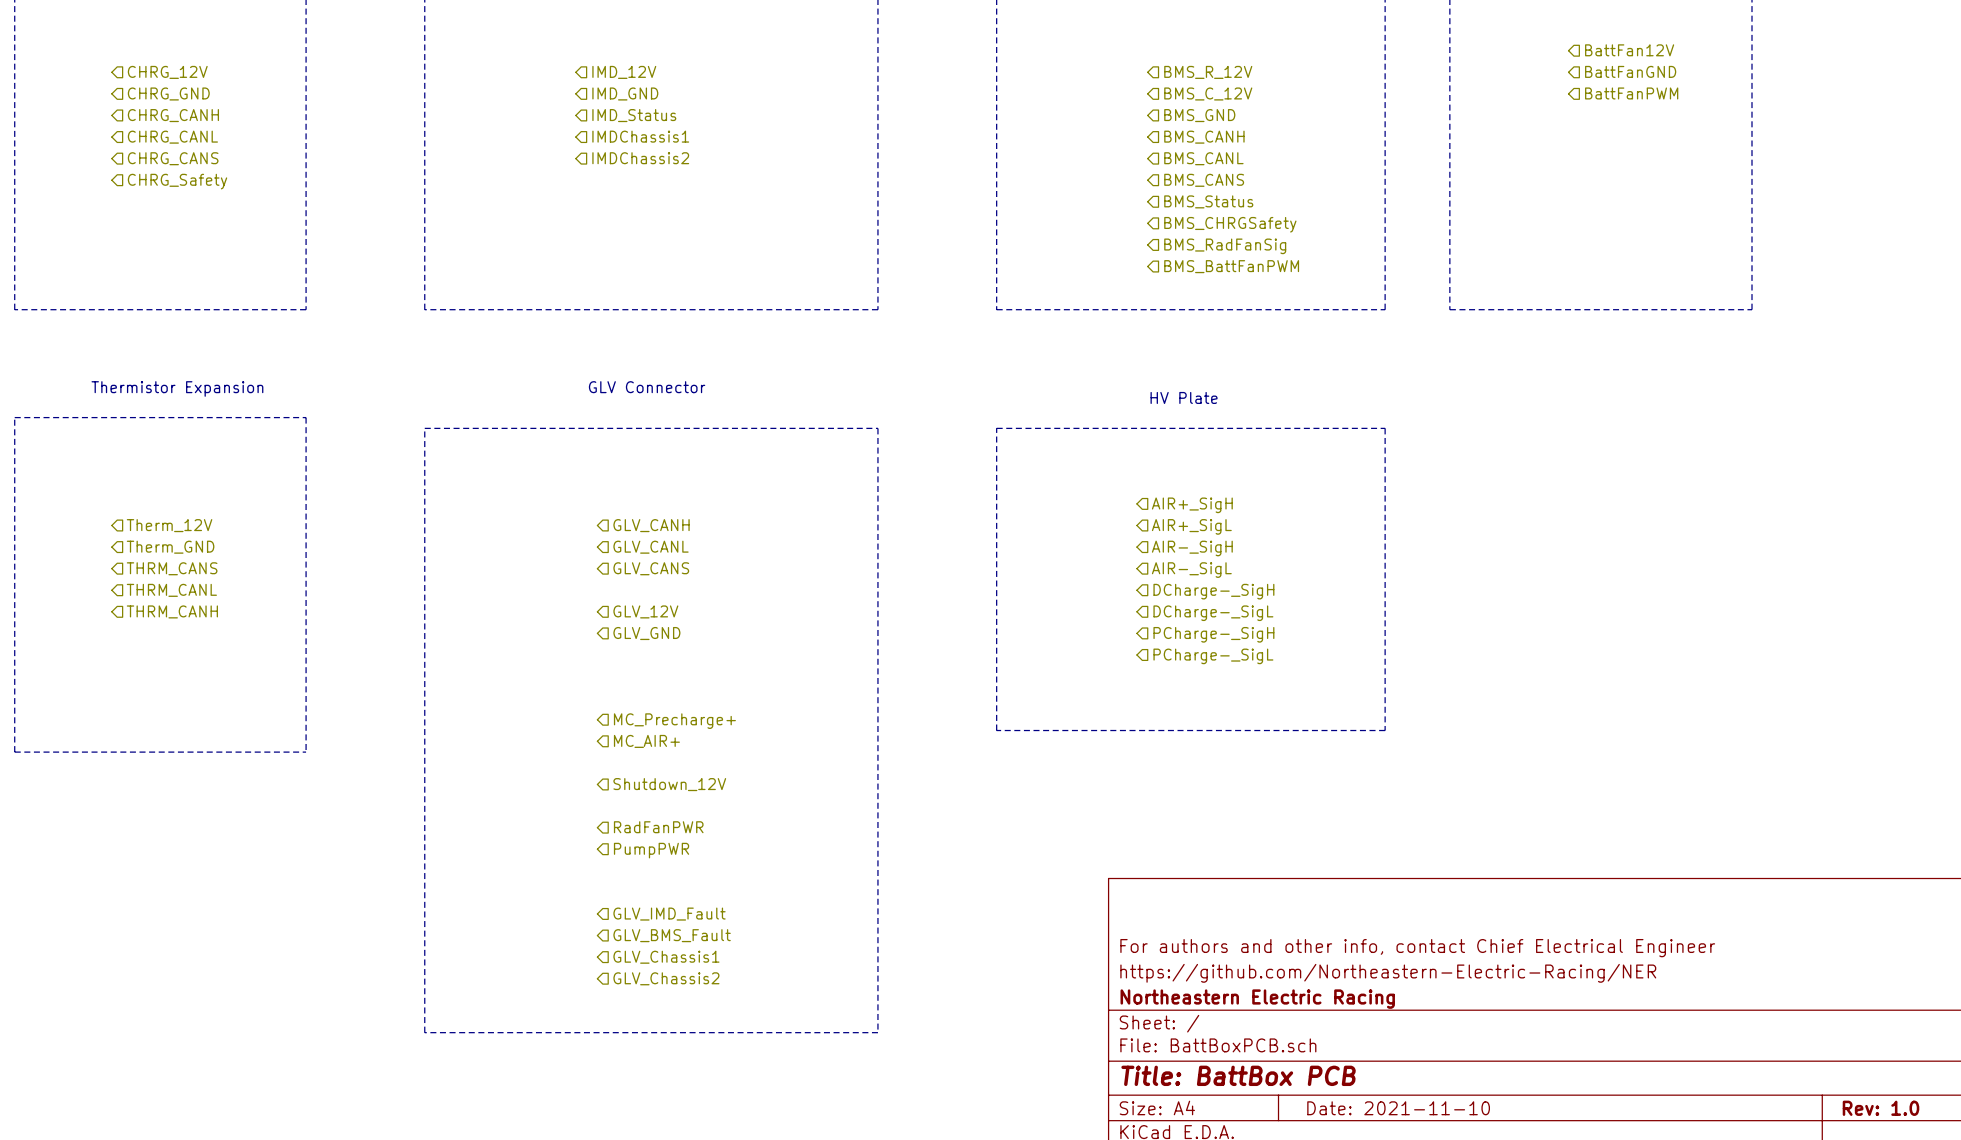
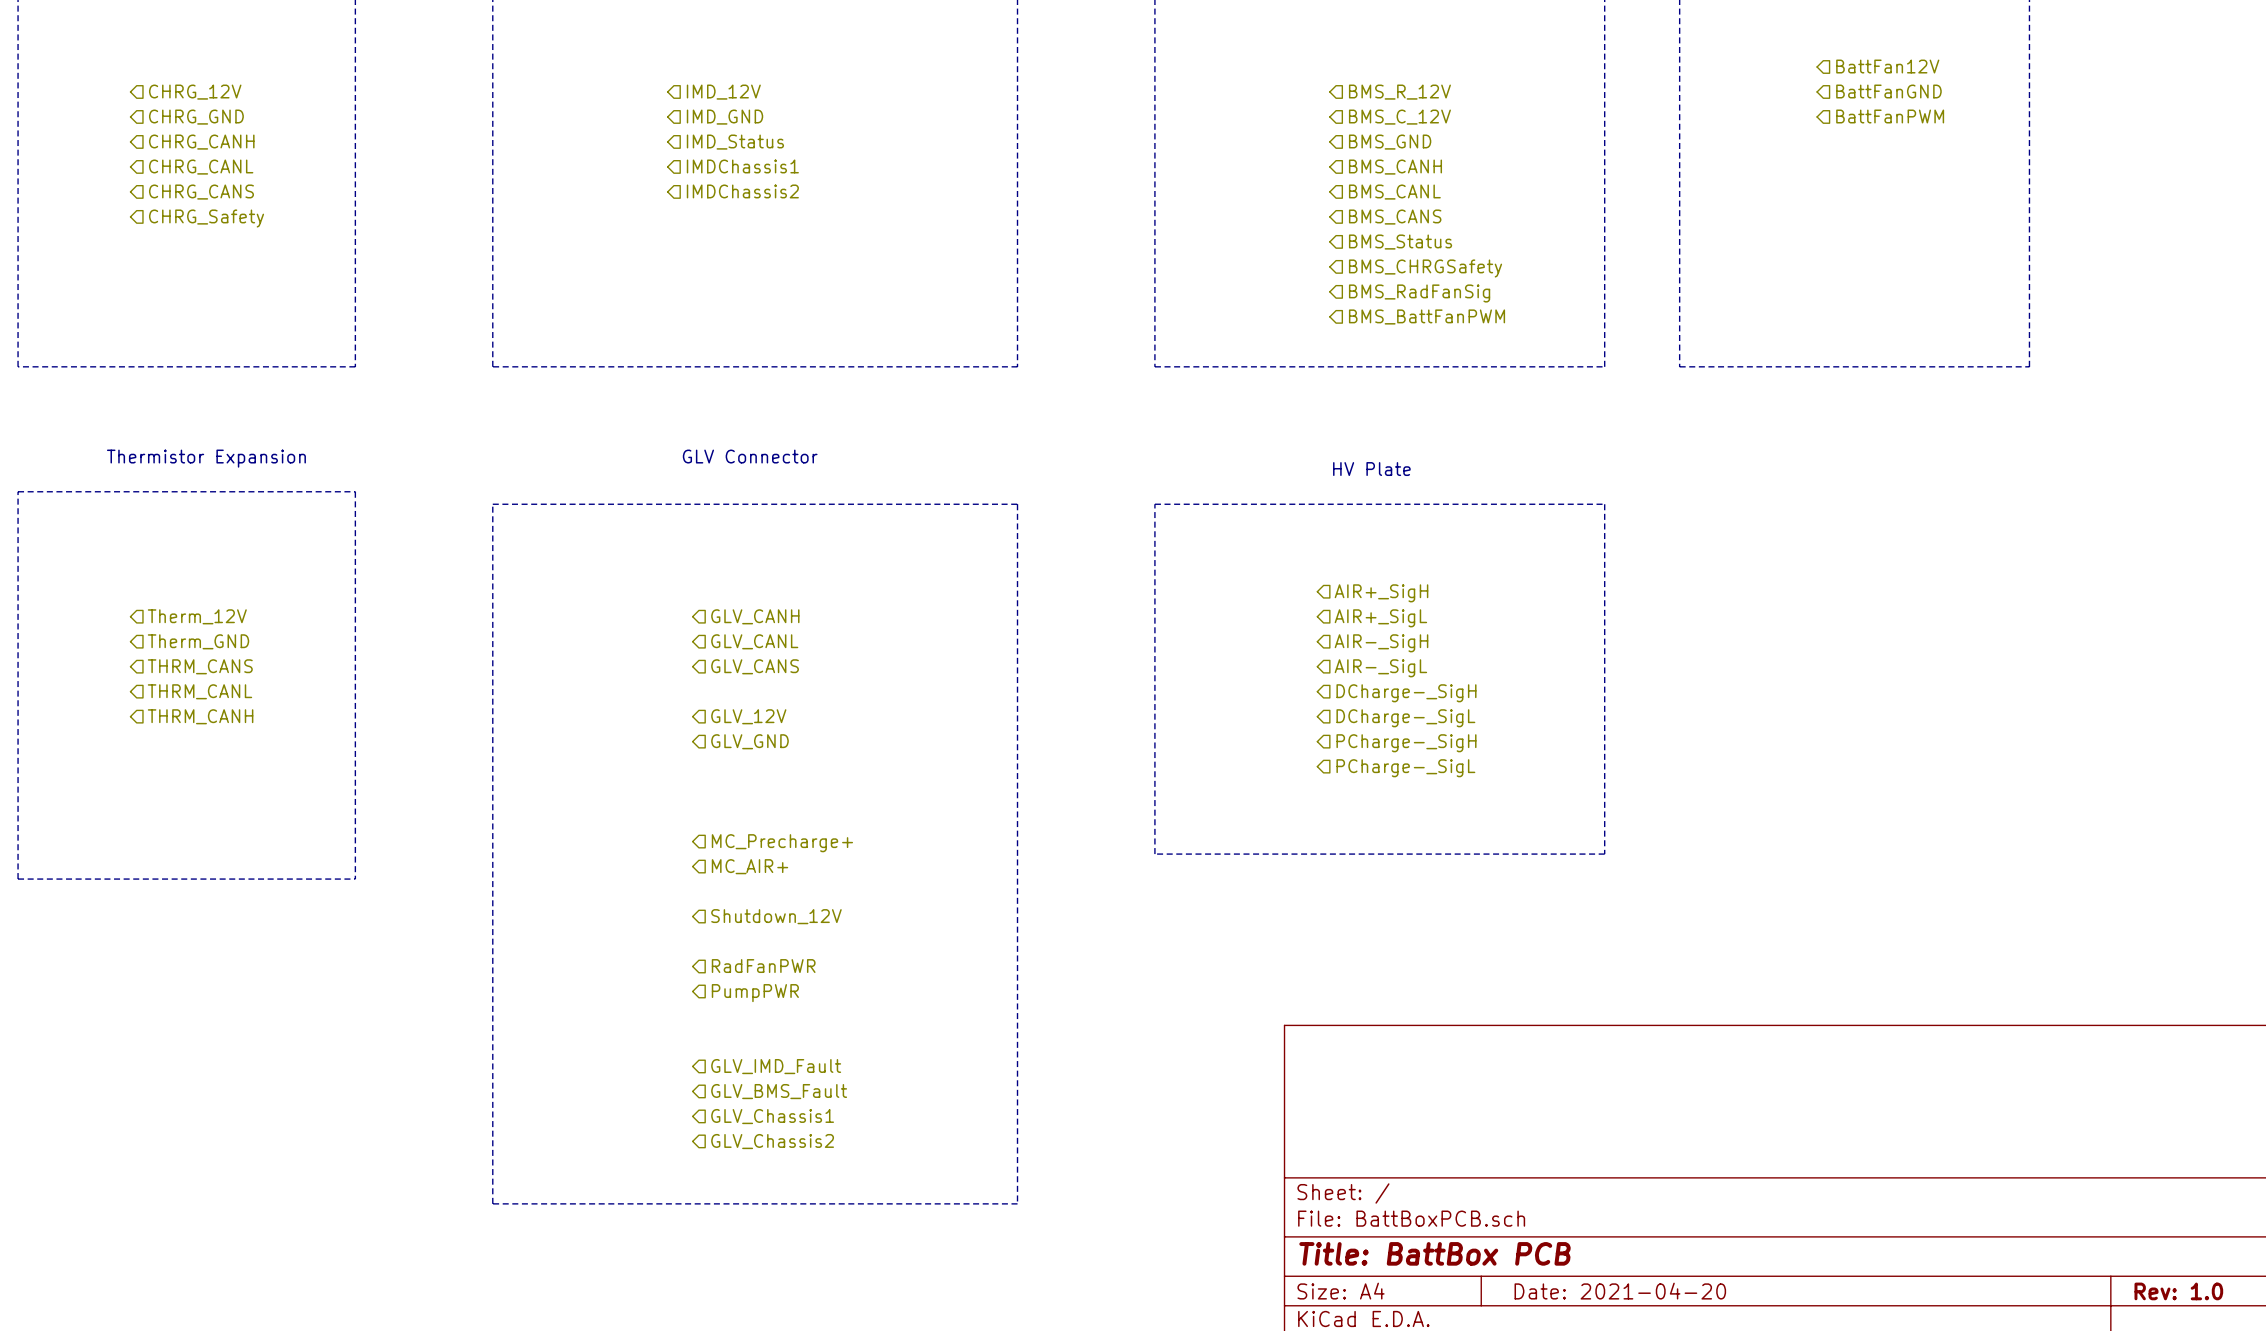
title block: For authors and other info, contact Chief Electrical Engineer (1417, 948) -> none
title block: https://github.com/Northeastern-Electric-Racing/NER (1388, 973) -> none
title block: Northeastern Electric Racing (1257, 999) -> none
title block: Date: 2021-11-10 (1398, 1108) -> Date: 2021-04-20 (1620, 1291)

